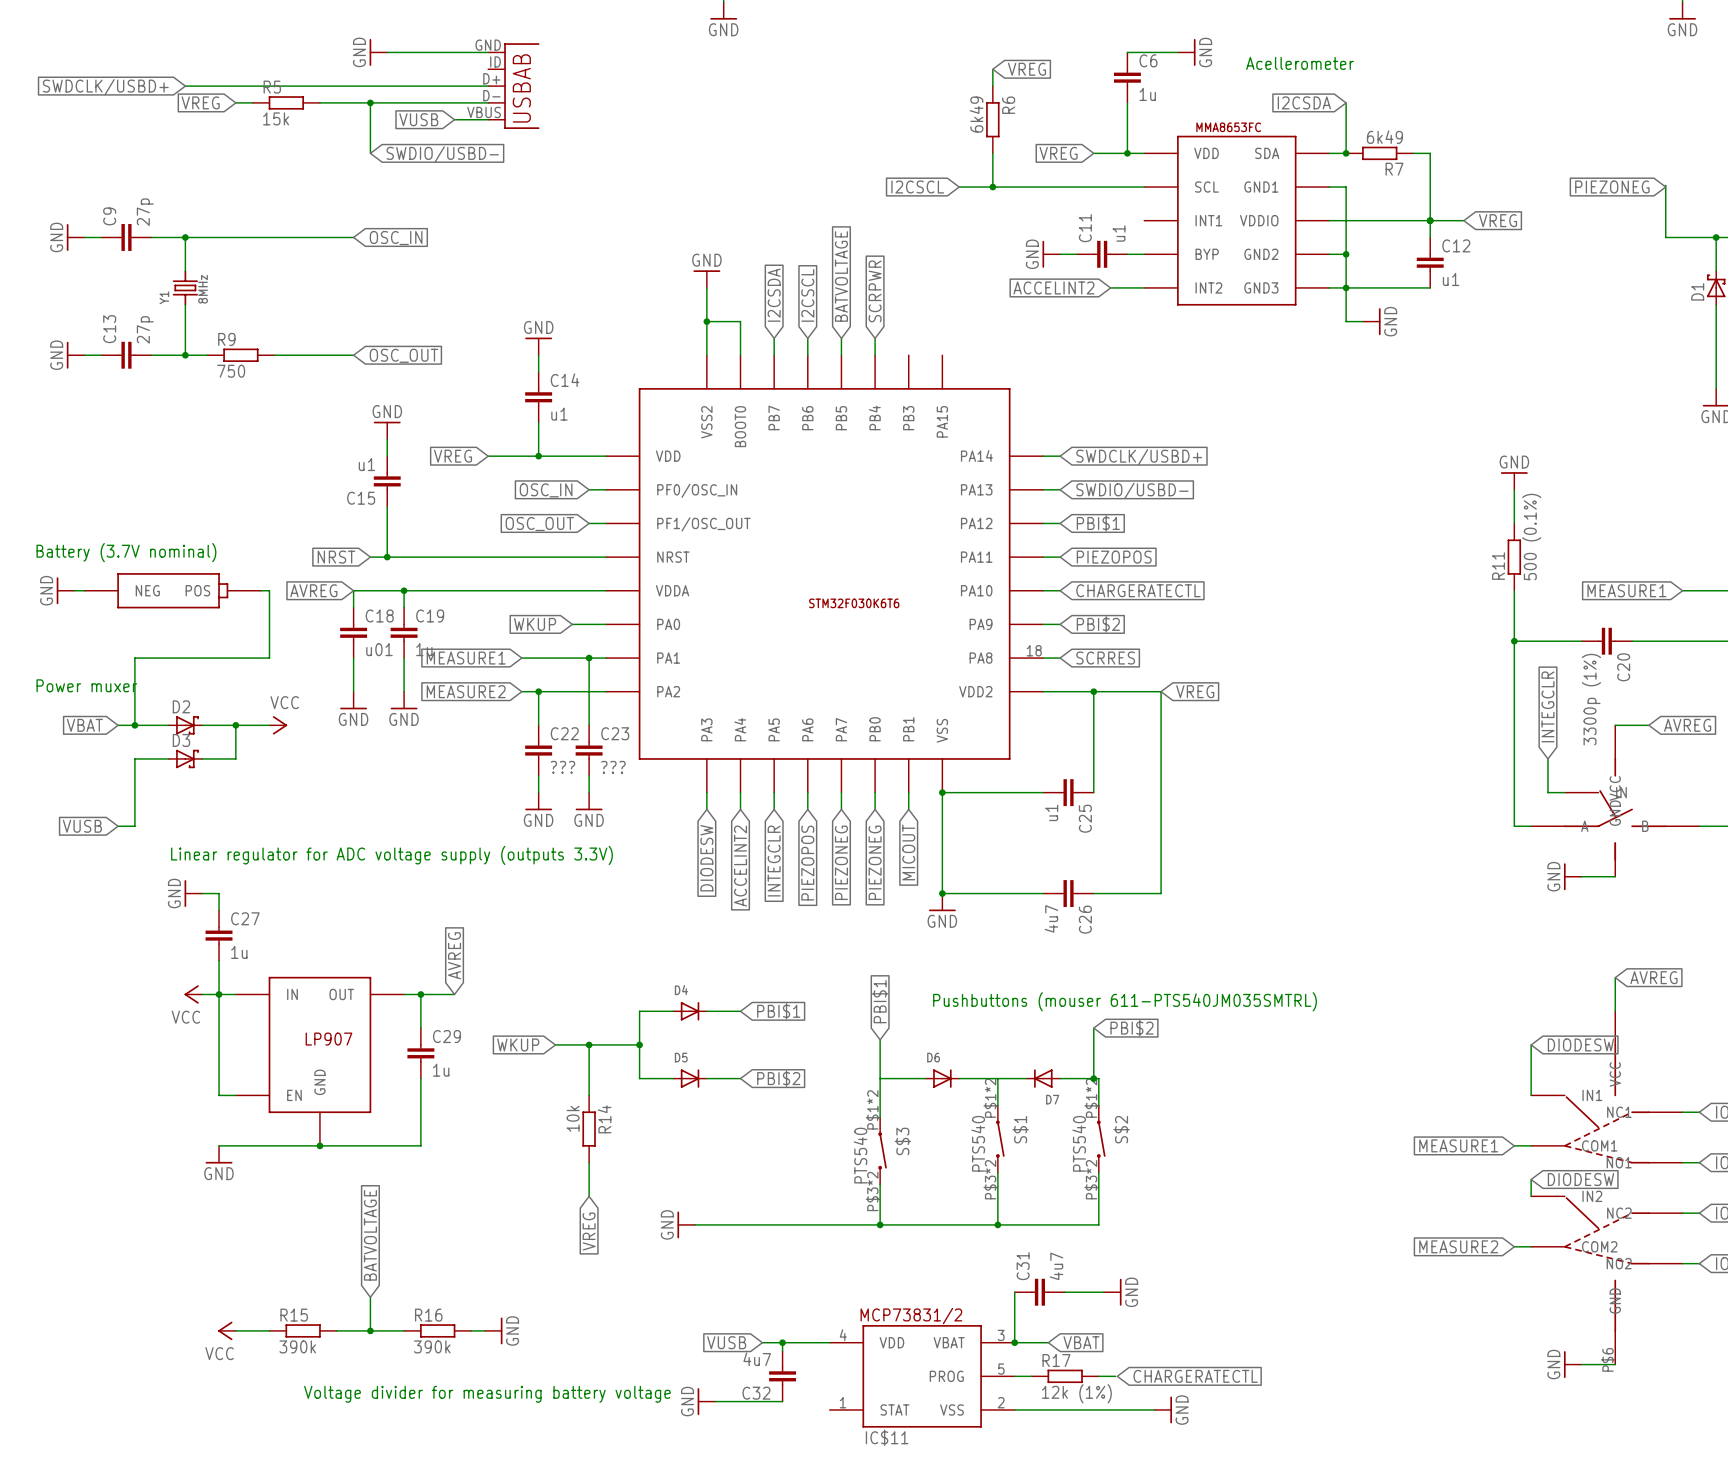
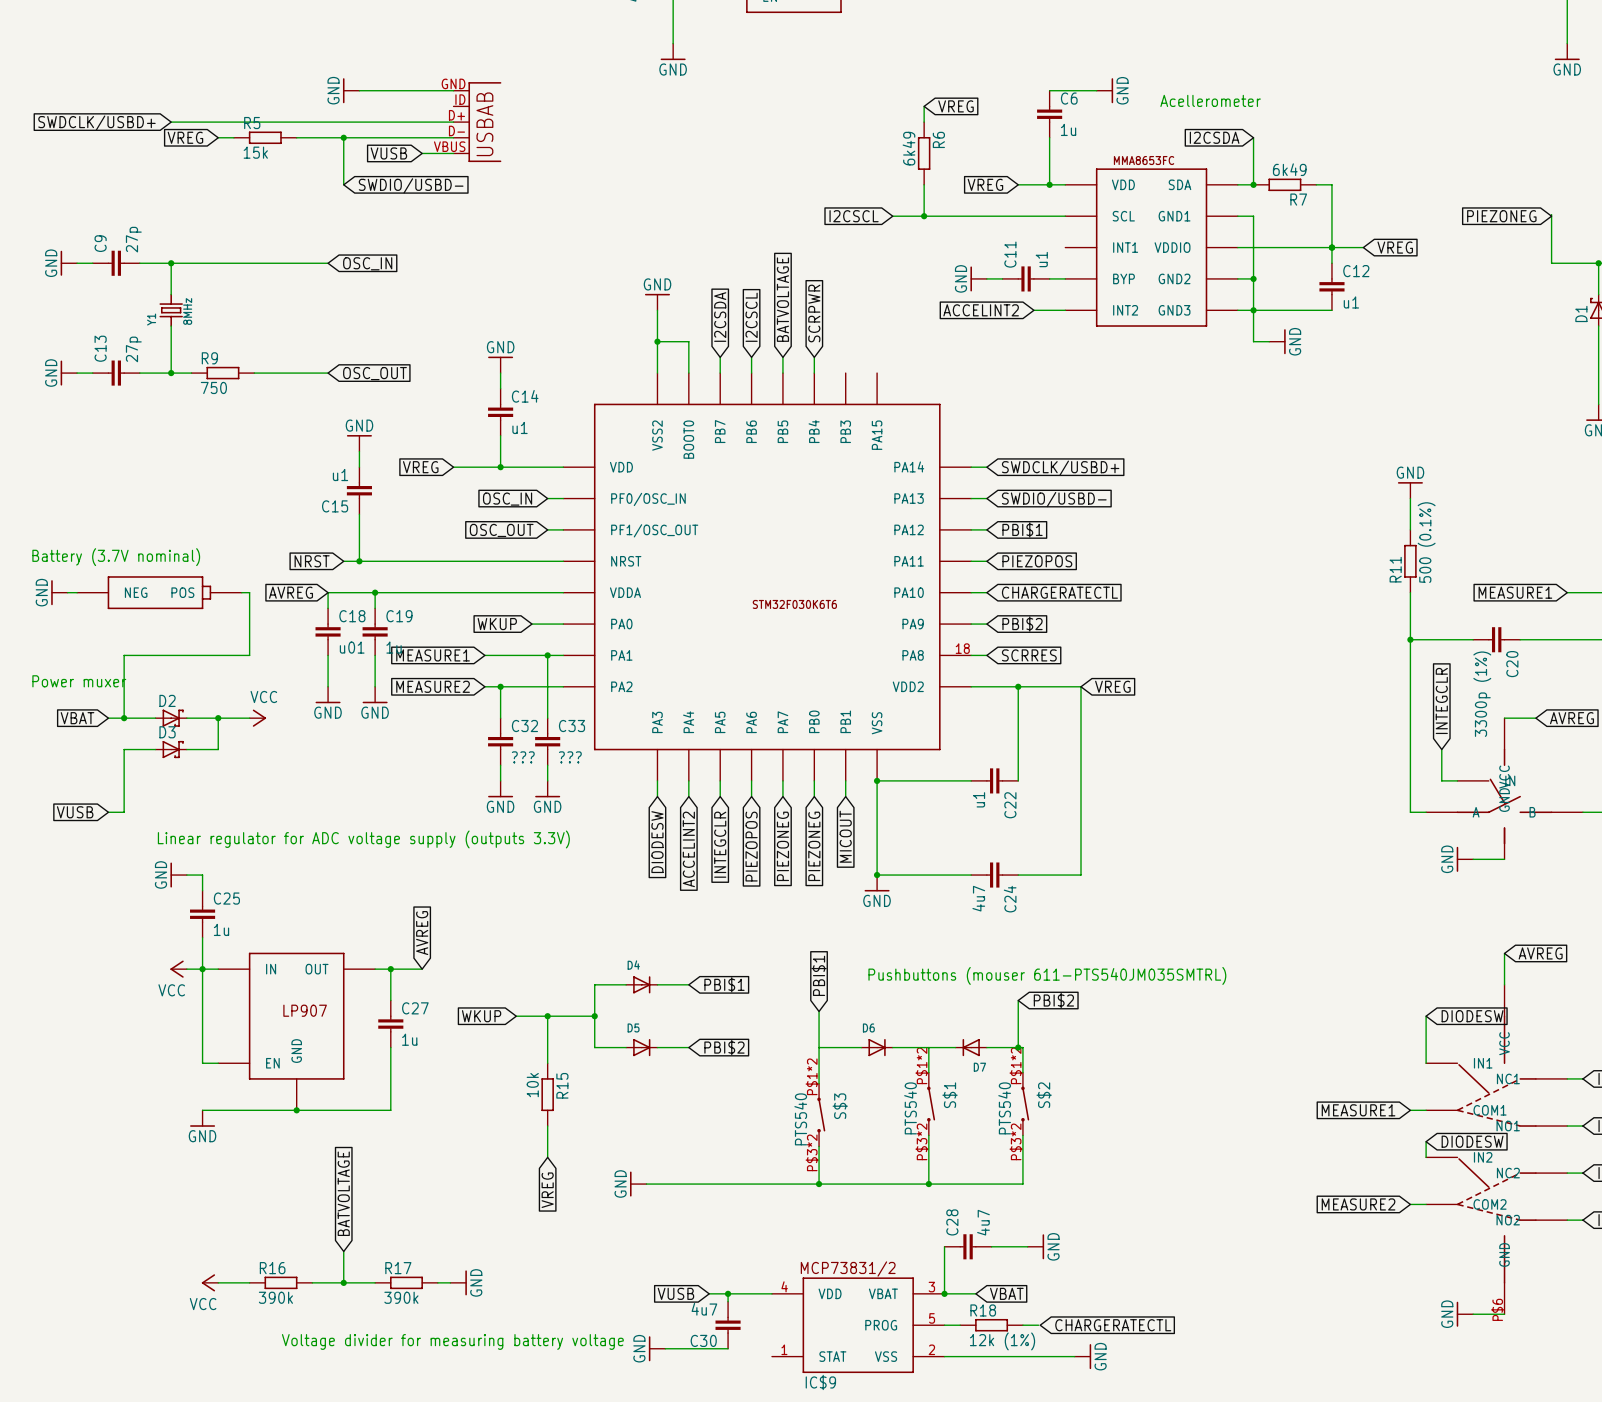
C22 name: C22 (564, 733) -> C32 (524, 726)
C23 name: C23 (615, 733) -> C33 (572, 726)
C25 name: C25 (1085, 818) -> C22 (1010, 805)
C27 name: C27 (245, 918) -> C25 (226, 898)
C26 name: C26 (1085, 919) -> C24 (1010, 899)
C29 name: C29 (446, 1036) -> C27 (415, 1008)
R14 name: R14 (604, 1119) -> R15 (562, 1085)
C31 name: C31 (1023, 1266) -> C28 (952, 1222)
R15 name: R15 (294, 1315) -> R16 (272, 1268)
R16 name: R16 (428, 1315) -> R17 (398, 1268)
R17 name: R17 (1056, 1360) -> R18 (983, 1310)
C32 name: C32 (756, 1393) -> C30 (703, 1340)
IC$11 name: IC$11 (887, 1437) -> IC$9 (820, 1382)

